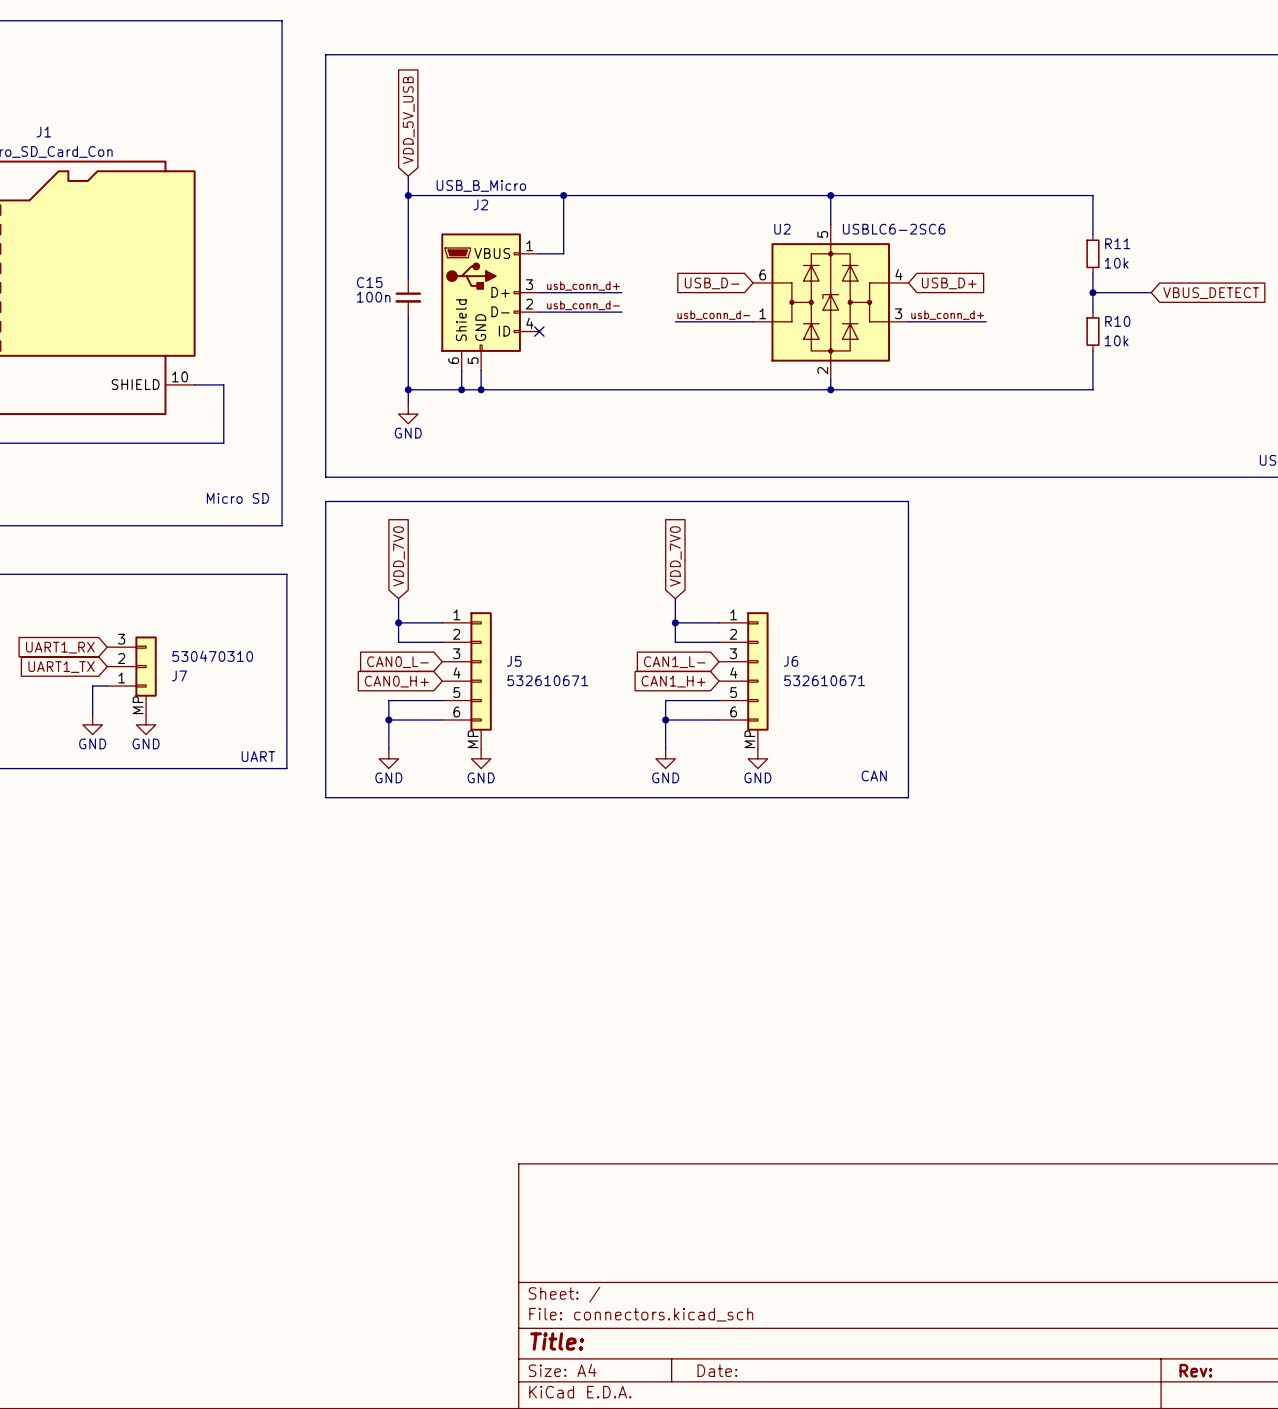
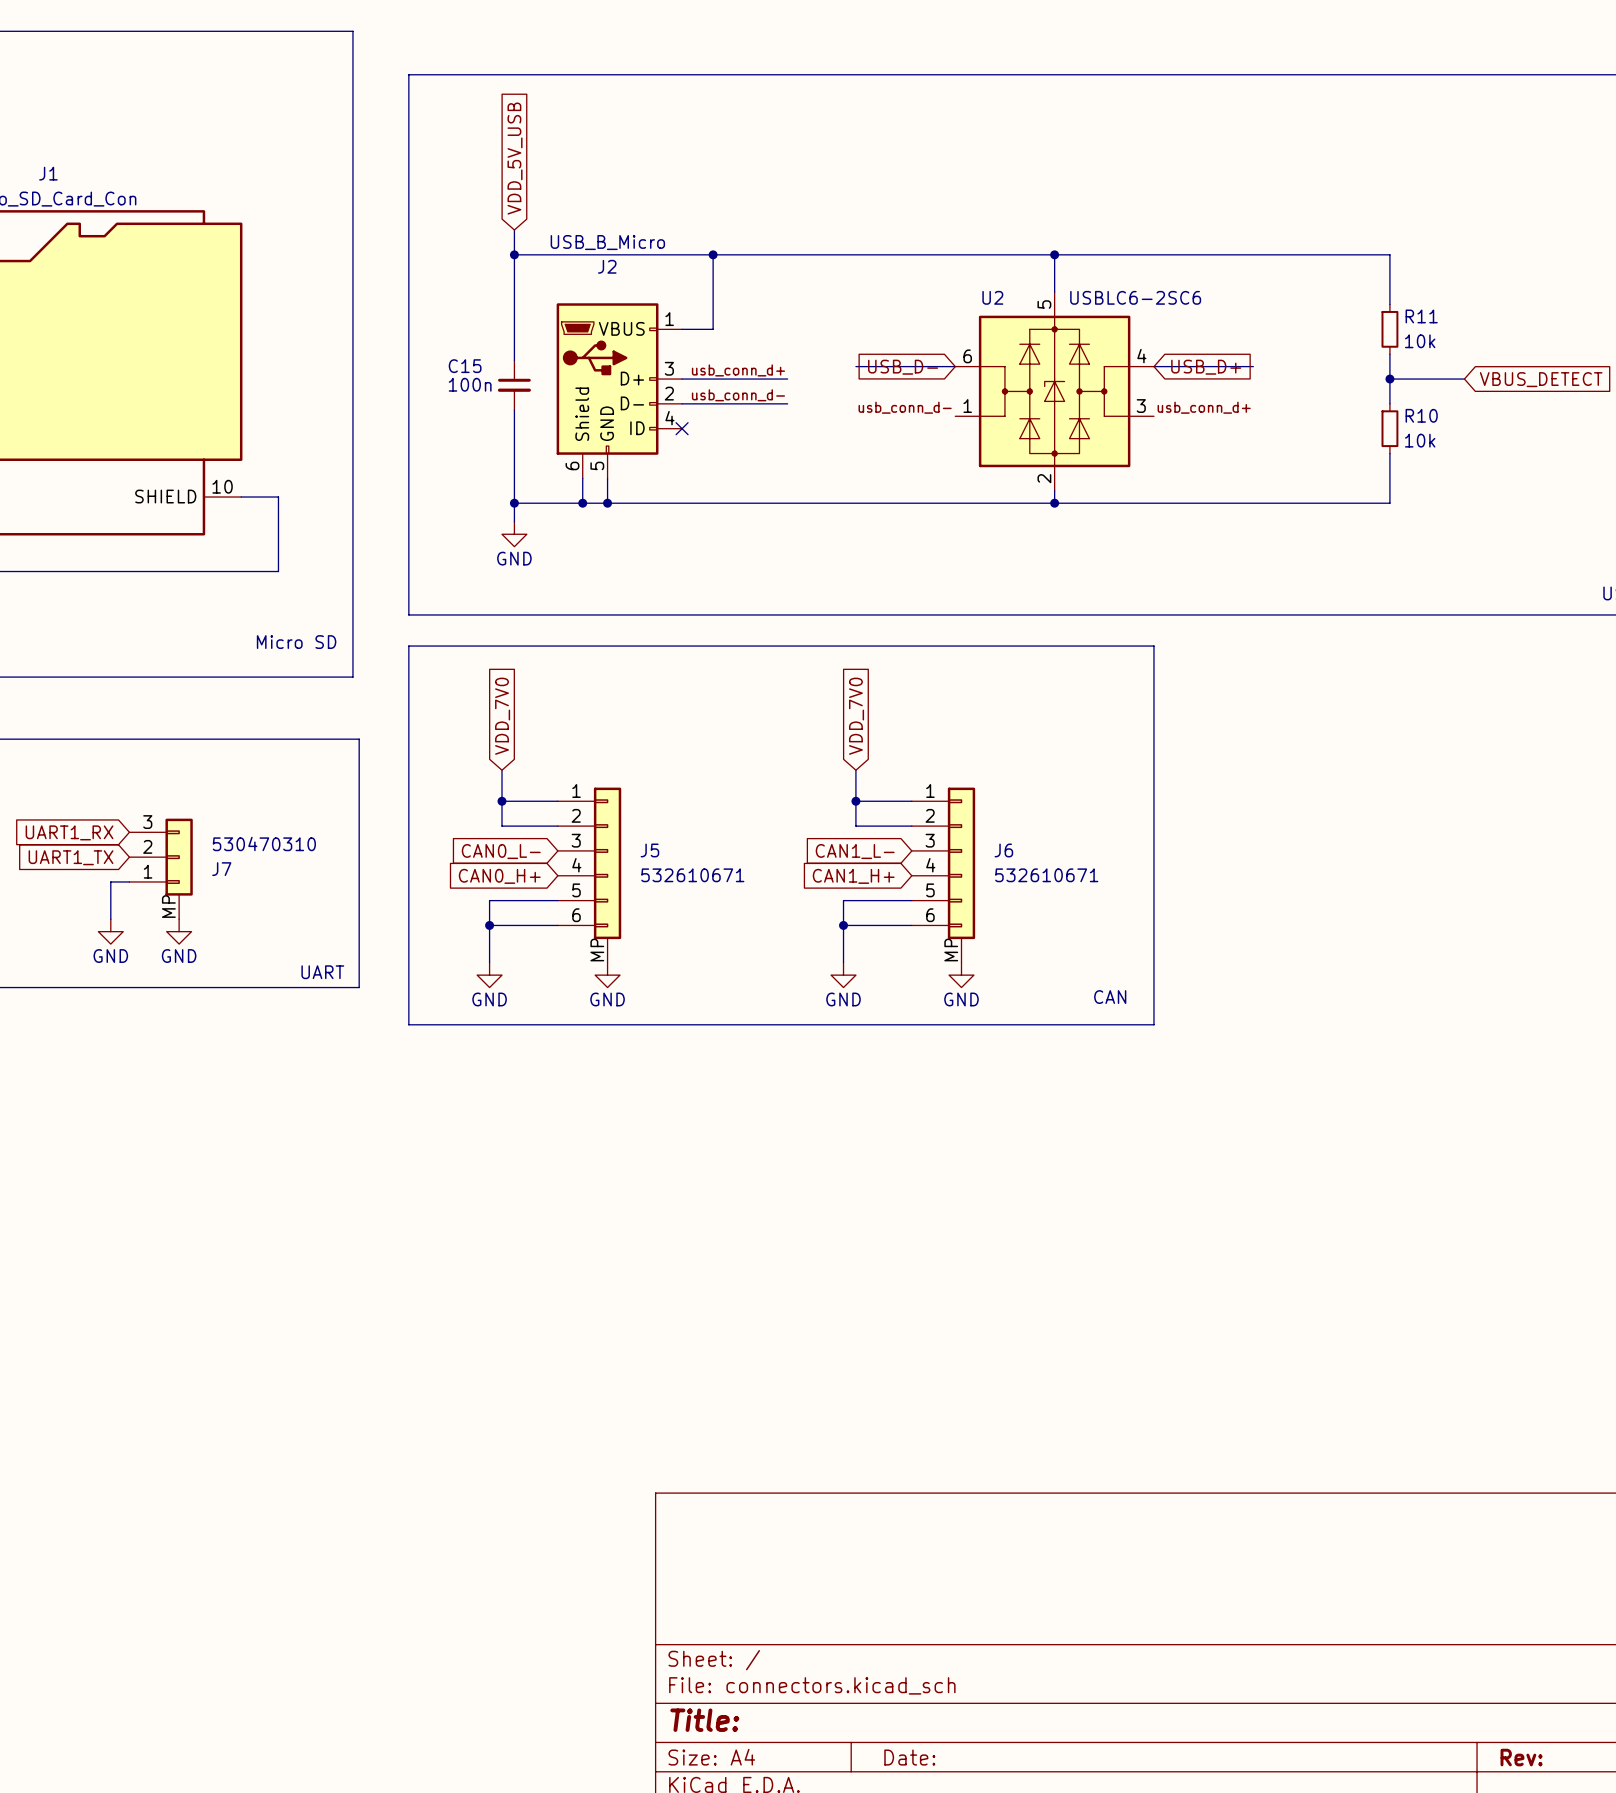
wire: (675, 321) (753, 321) -> (855, 366) (955, 366)
wire: (908, 321) (986, 321) -> (1153, 366) (1253, 366)

